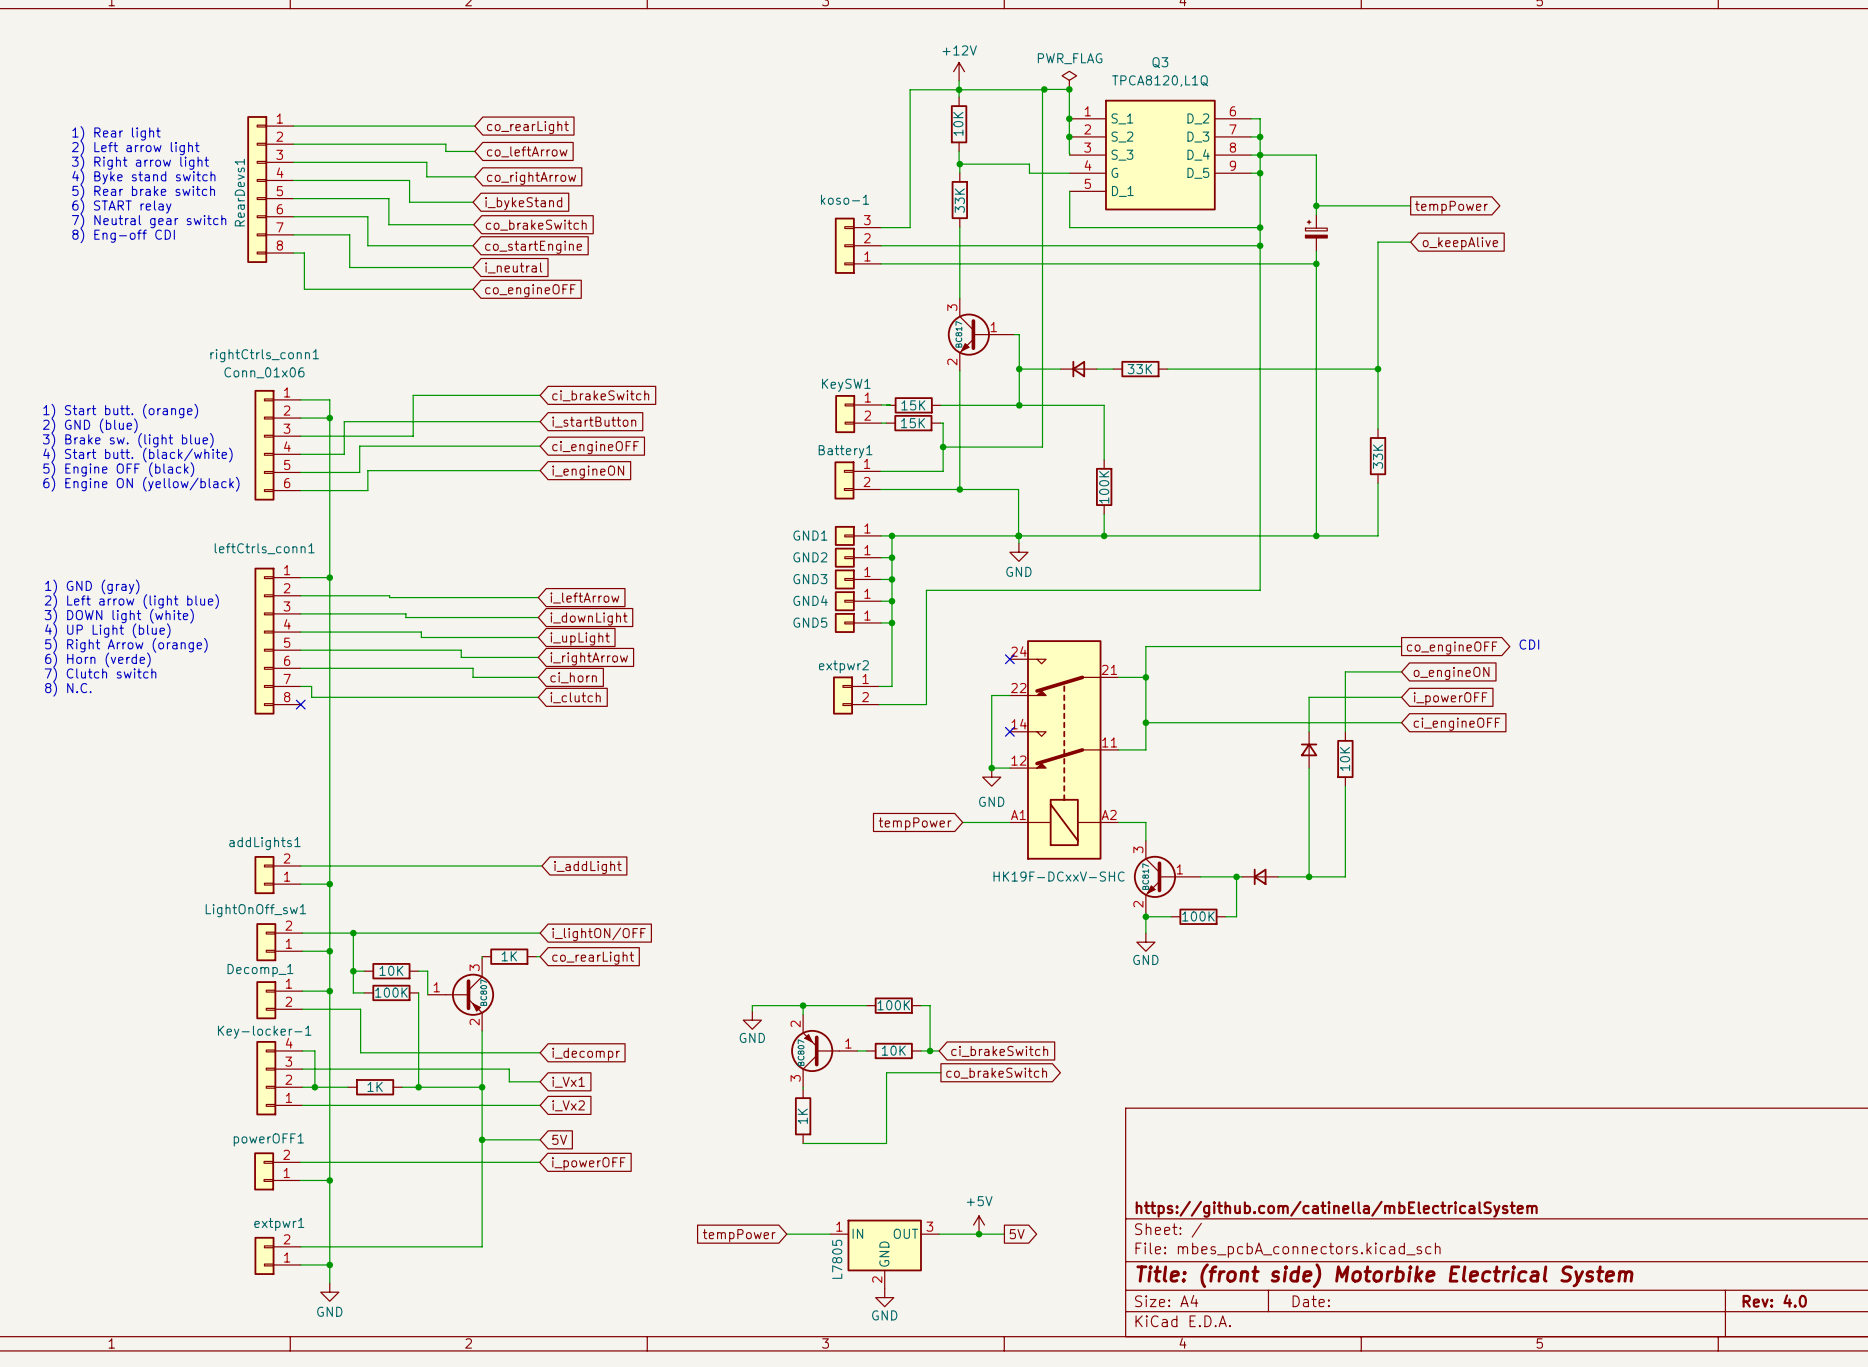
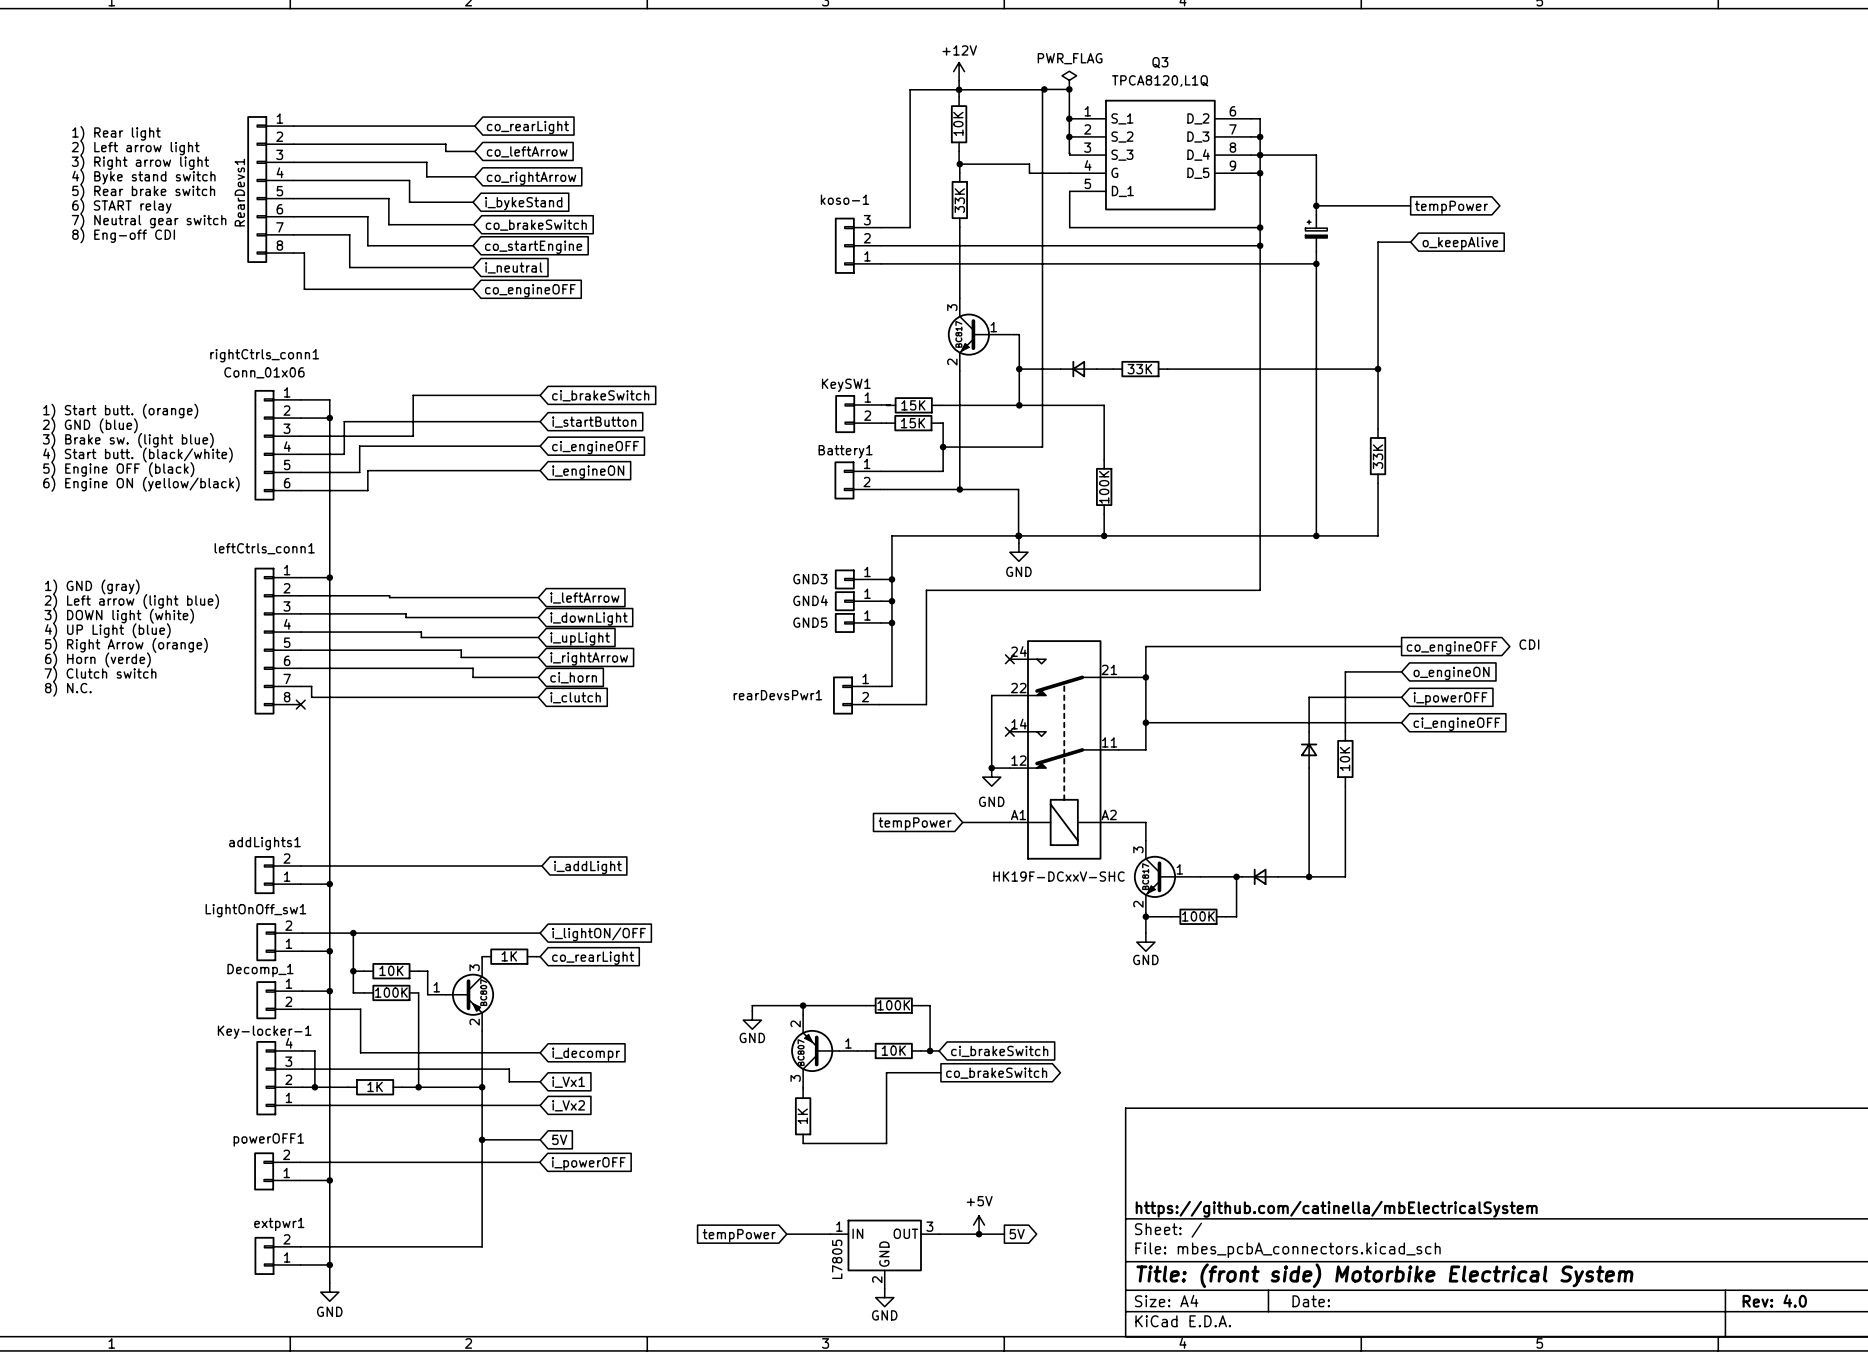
GND1: (857, 535) -> none
wire: (881, 535) (891, 535) -> none
junction: (891, 535) -> none
GND2: (857, 557) -> none
wire: (881, 557) (891, 557) -> none
junction: (891, 557) -> none
extpwr2 name: extpwr2 (843, 666) -> rearDevsPwr1 (777, 695)

